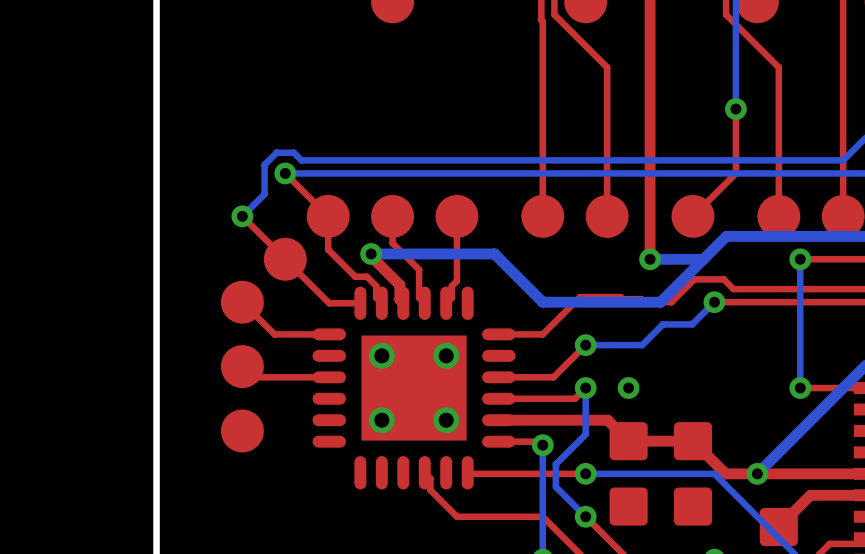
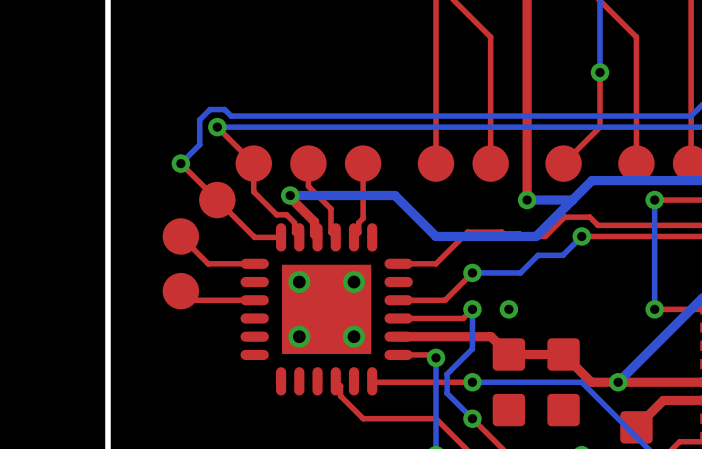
part: (242, 430) -> none

